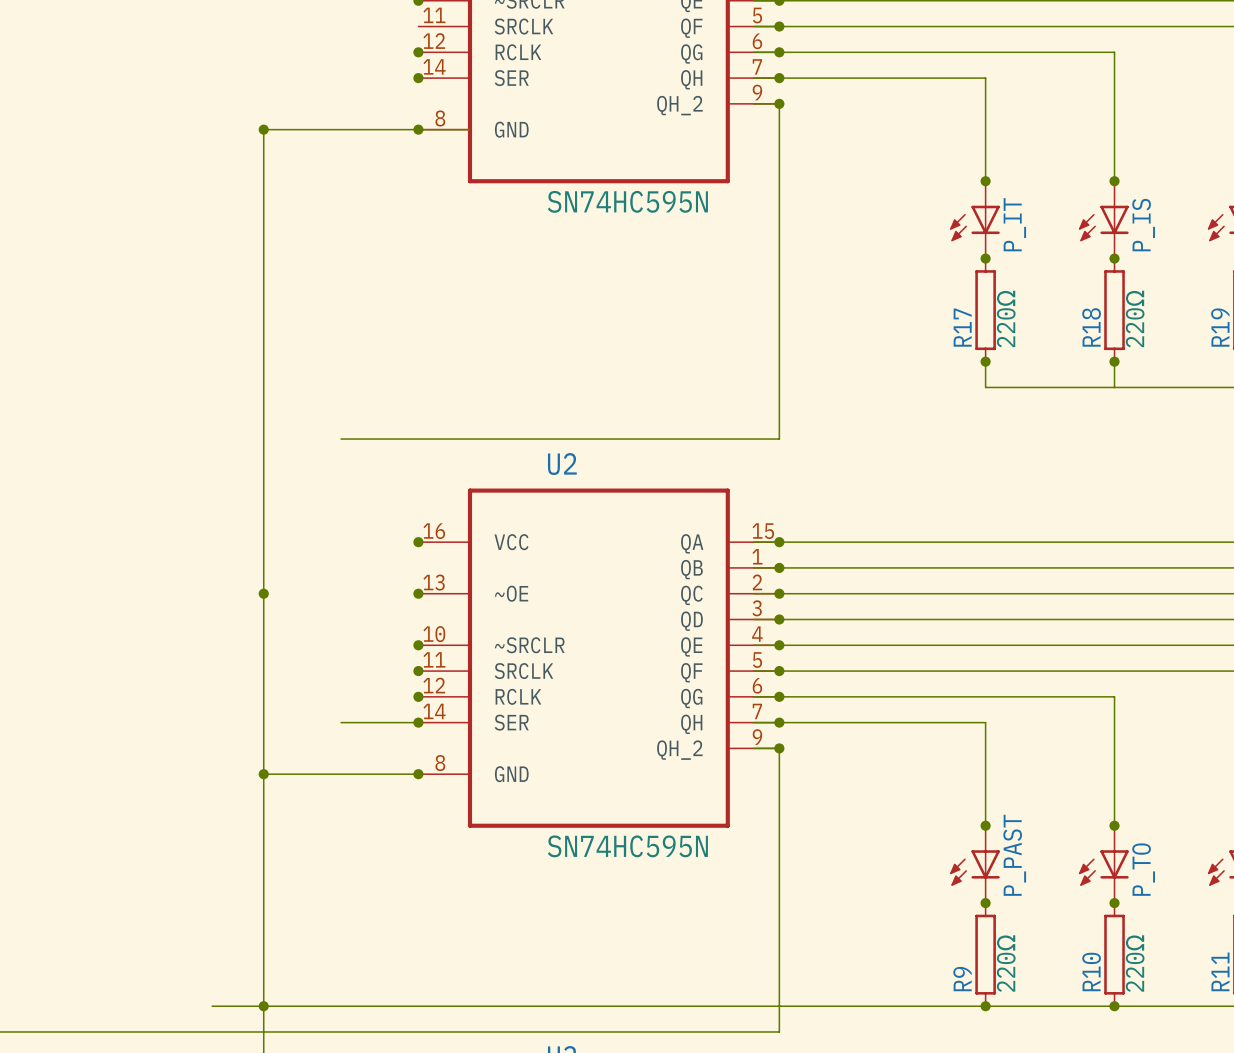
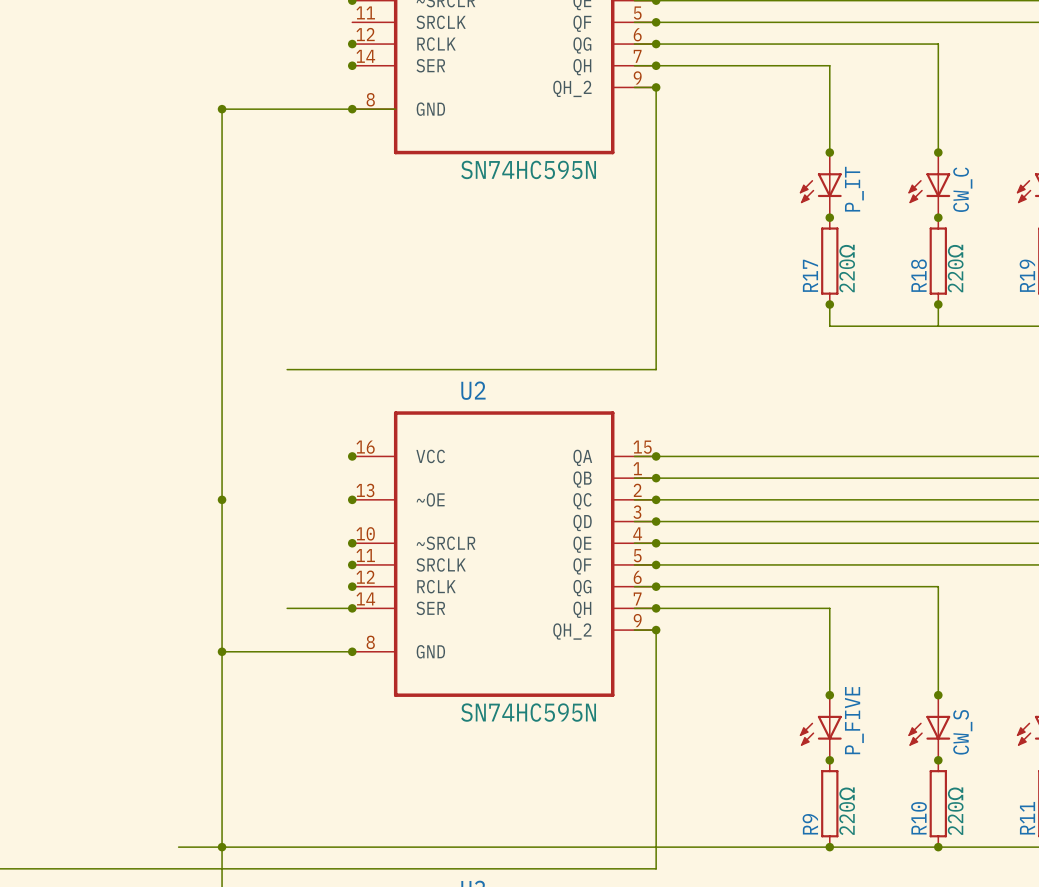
P_IS name: P_IS (1143, 225) -> CW_C (962, 189)
P_PAST name: P_PAST (1014, 855) -> P_FIVE (854, 720)
P_TO name: P_TO (1143, 869) -> CW_S (962, 732)

